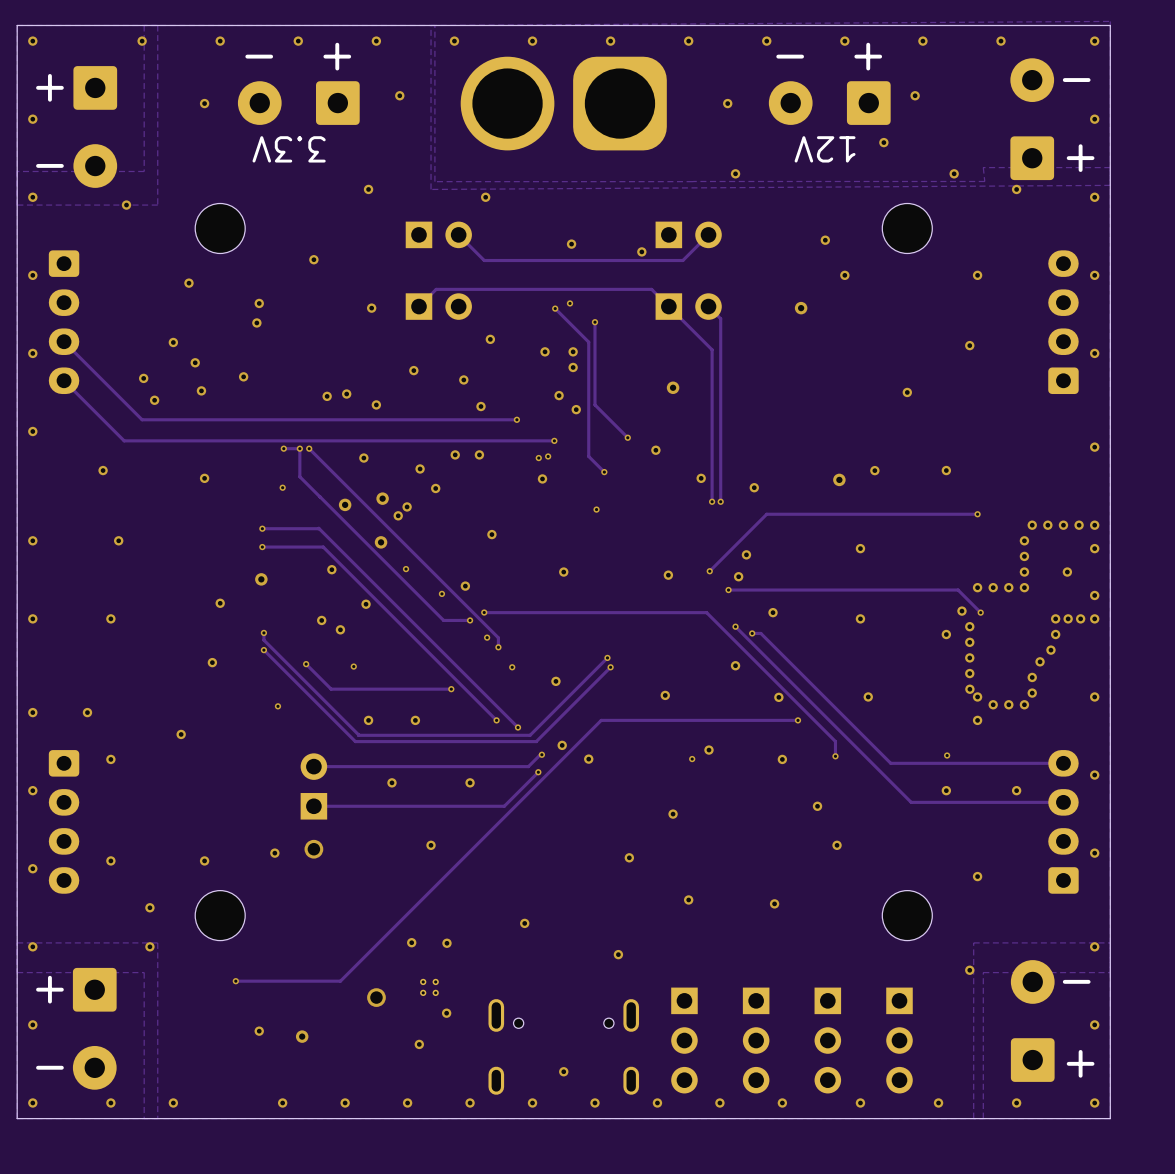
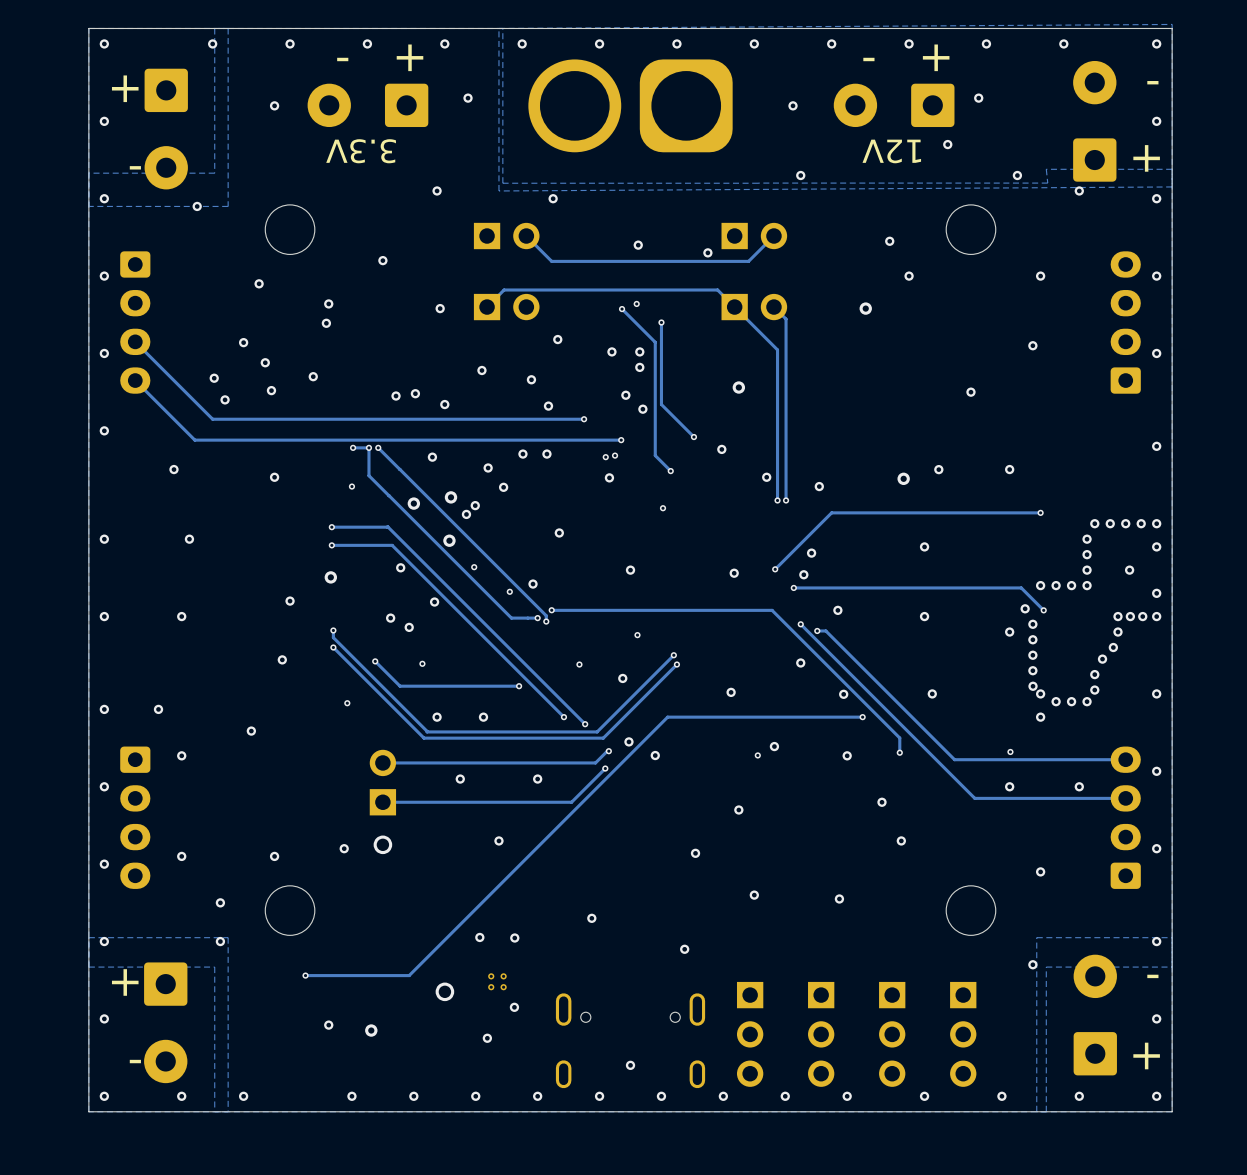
track: (330, 470) (498, 637) (498, 647) -> (399, 469) (546, 615) (546, 621)
via: none -> (546, 621)
via: (487, 637) -> none
via: none -> (637, 635)
via: (498, 647) -> none

